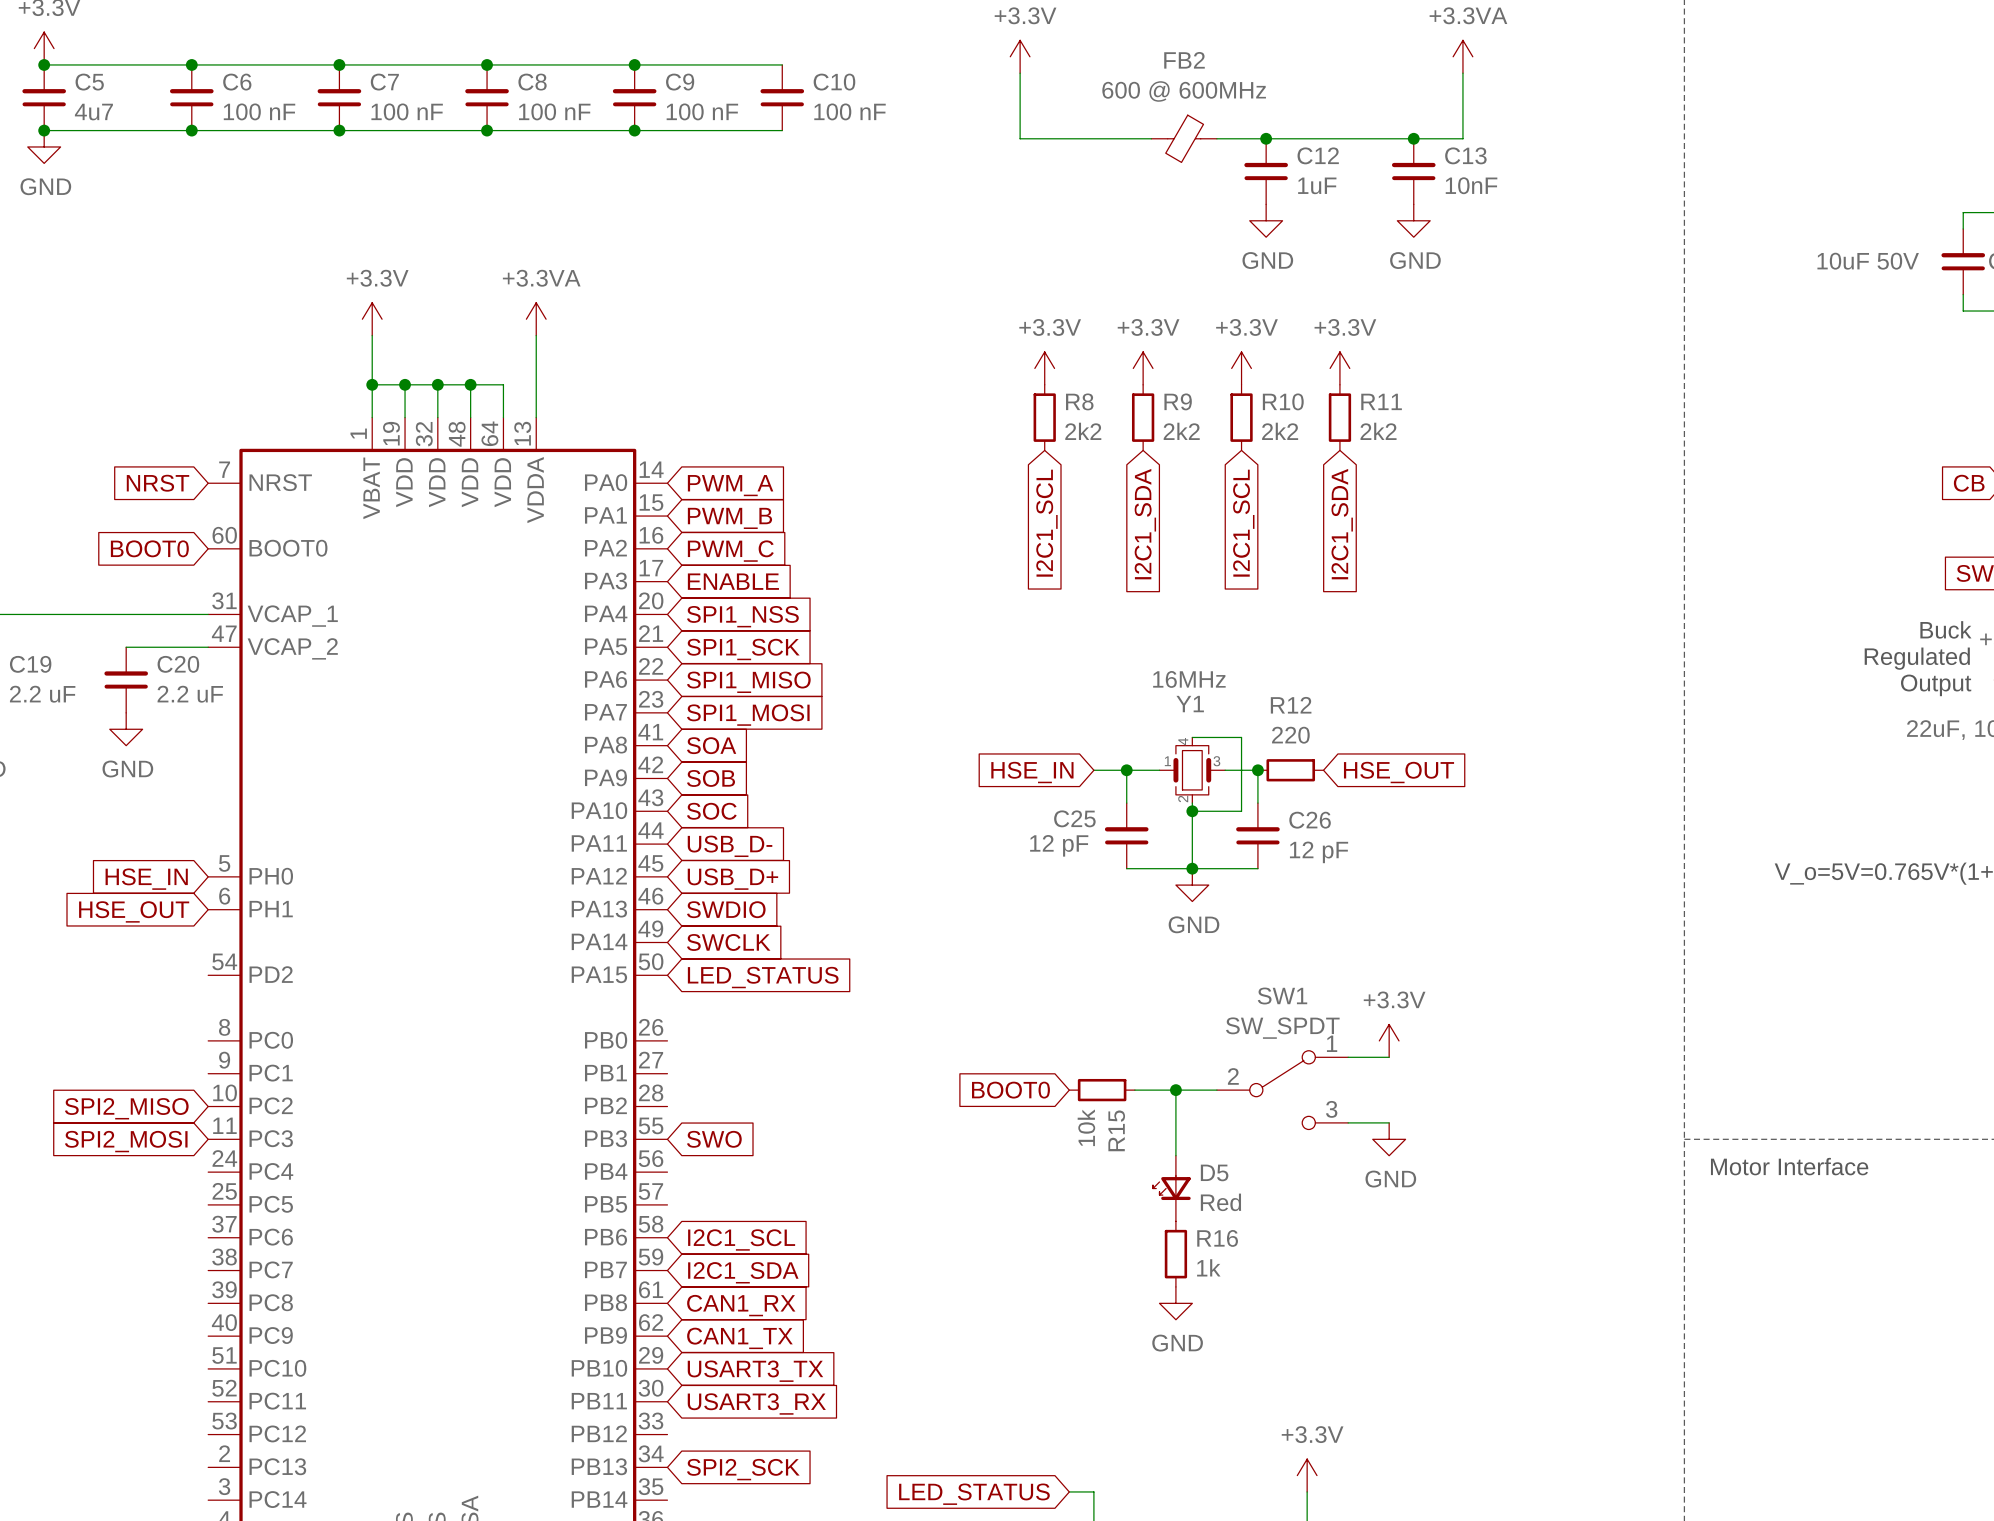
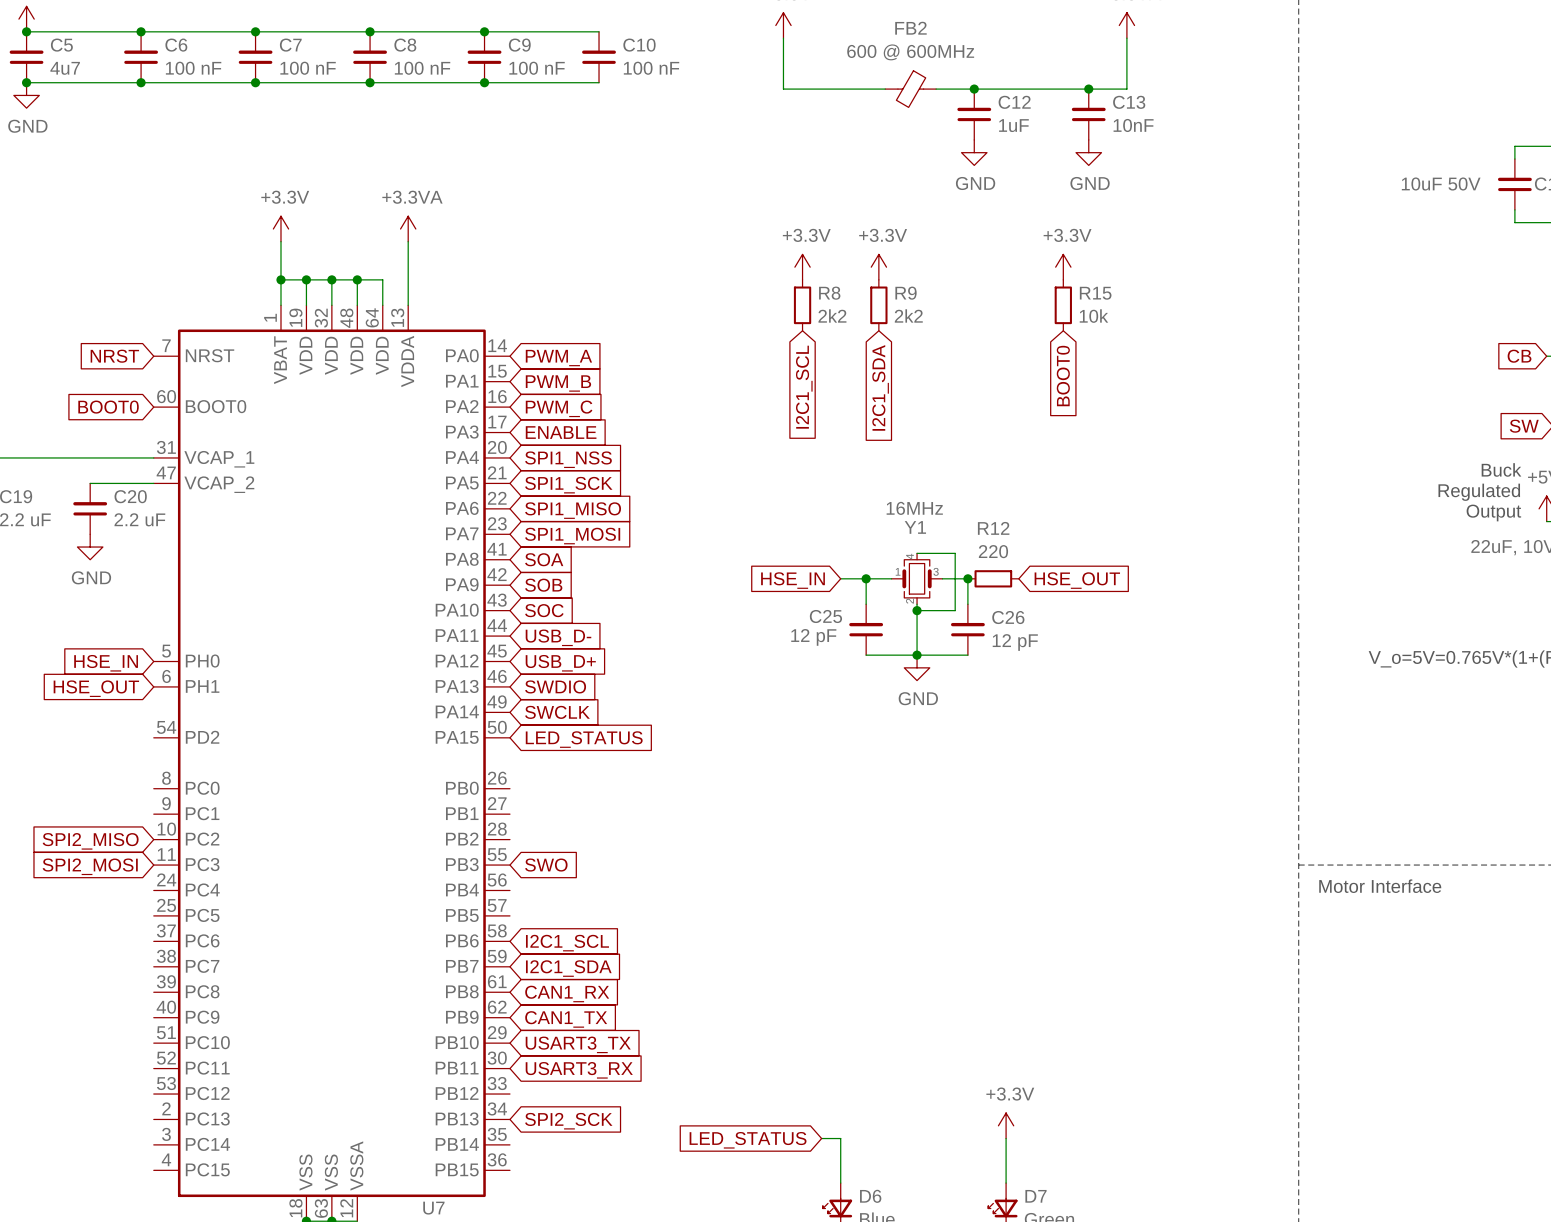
power symbol: +3.3V (1241, 368) -> none
power symbol position: +3.3V (1339, 368) -> +3.3V (1063, 267)
R10: 2k2 (1241, 417) -> none
R11: 2k2 (1339, 417) -> none
global label: none -> BOOT0 (1063, 376)
global label: I2C1_SCL (1243, 523) -> none
global label: I2C1_SDA (1342, 524) -> none
power symbol: +3.3V (1389, 1040) -> none
wire: (1348, 1057) (1389, 1057) -> none
global label: BOOT0 (1010, 1090) -> none
R15 rotation: 0° (1102, 1090) -> 90° clockwise (1063, 305)
R15 position: (1102, 1090) -> (1063, 305)
wire: (1134, 1090) (1216, 1090) -> none
wire: (1175, 1090) (1175, 1155) -> none
junction: (1175, 1090) -> none
SW1: SW_SPDT (1282, 1090) -> none
wire: (1348, 1122) (1389, 1122) -> none
R15 value position: 10k (1086, 1127) -> 10k (1093, 316)
R15 name position: R15 (1116, 1130) -> R15 (1095, 293)
power symbol: GND (1389, 1139) -> none
D5: Red (1171, 1188) -> none
R16: 1k (1175, 1254) -> none
power symbol: GND (1175, 1303) -> none

